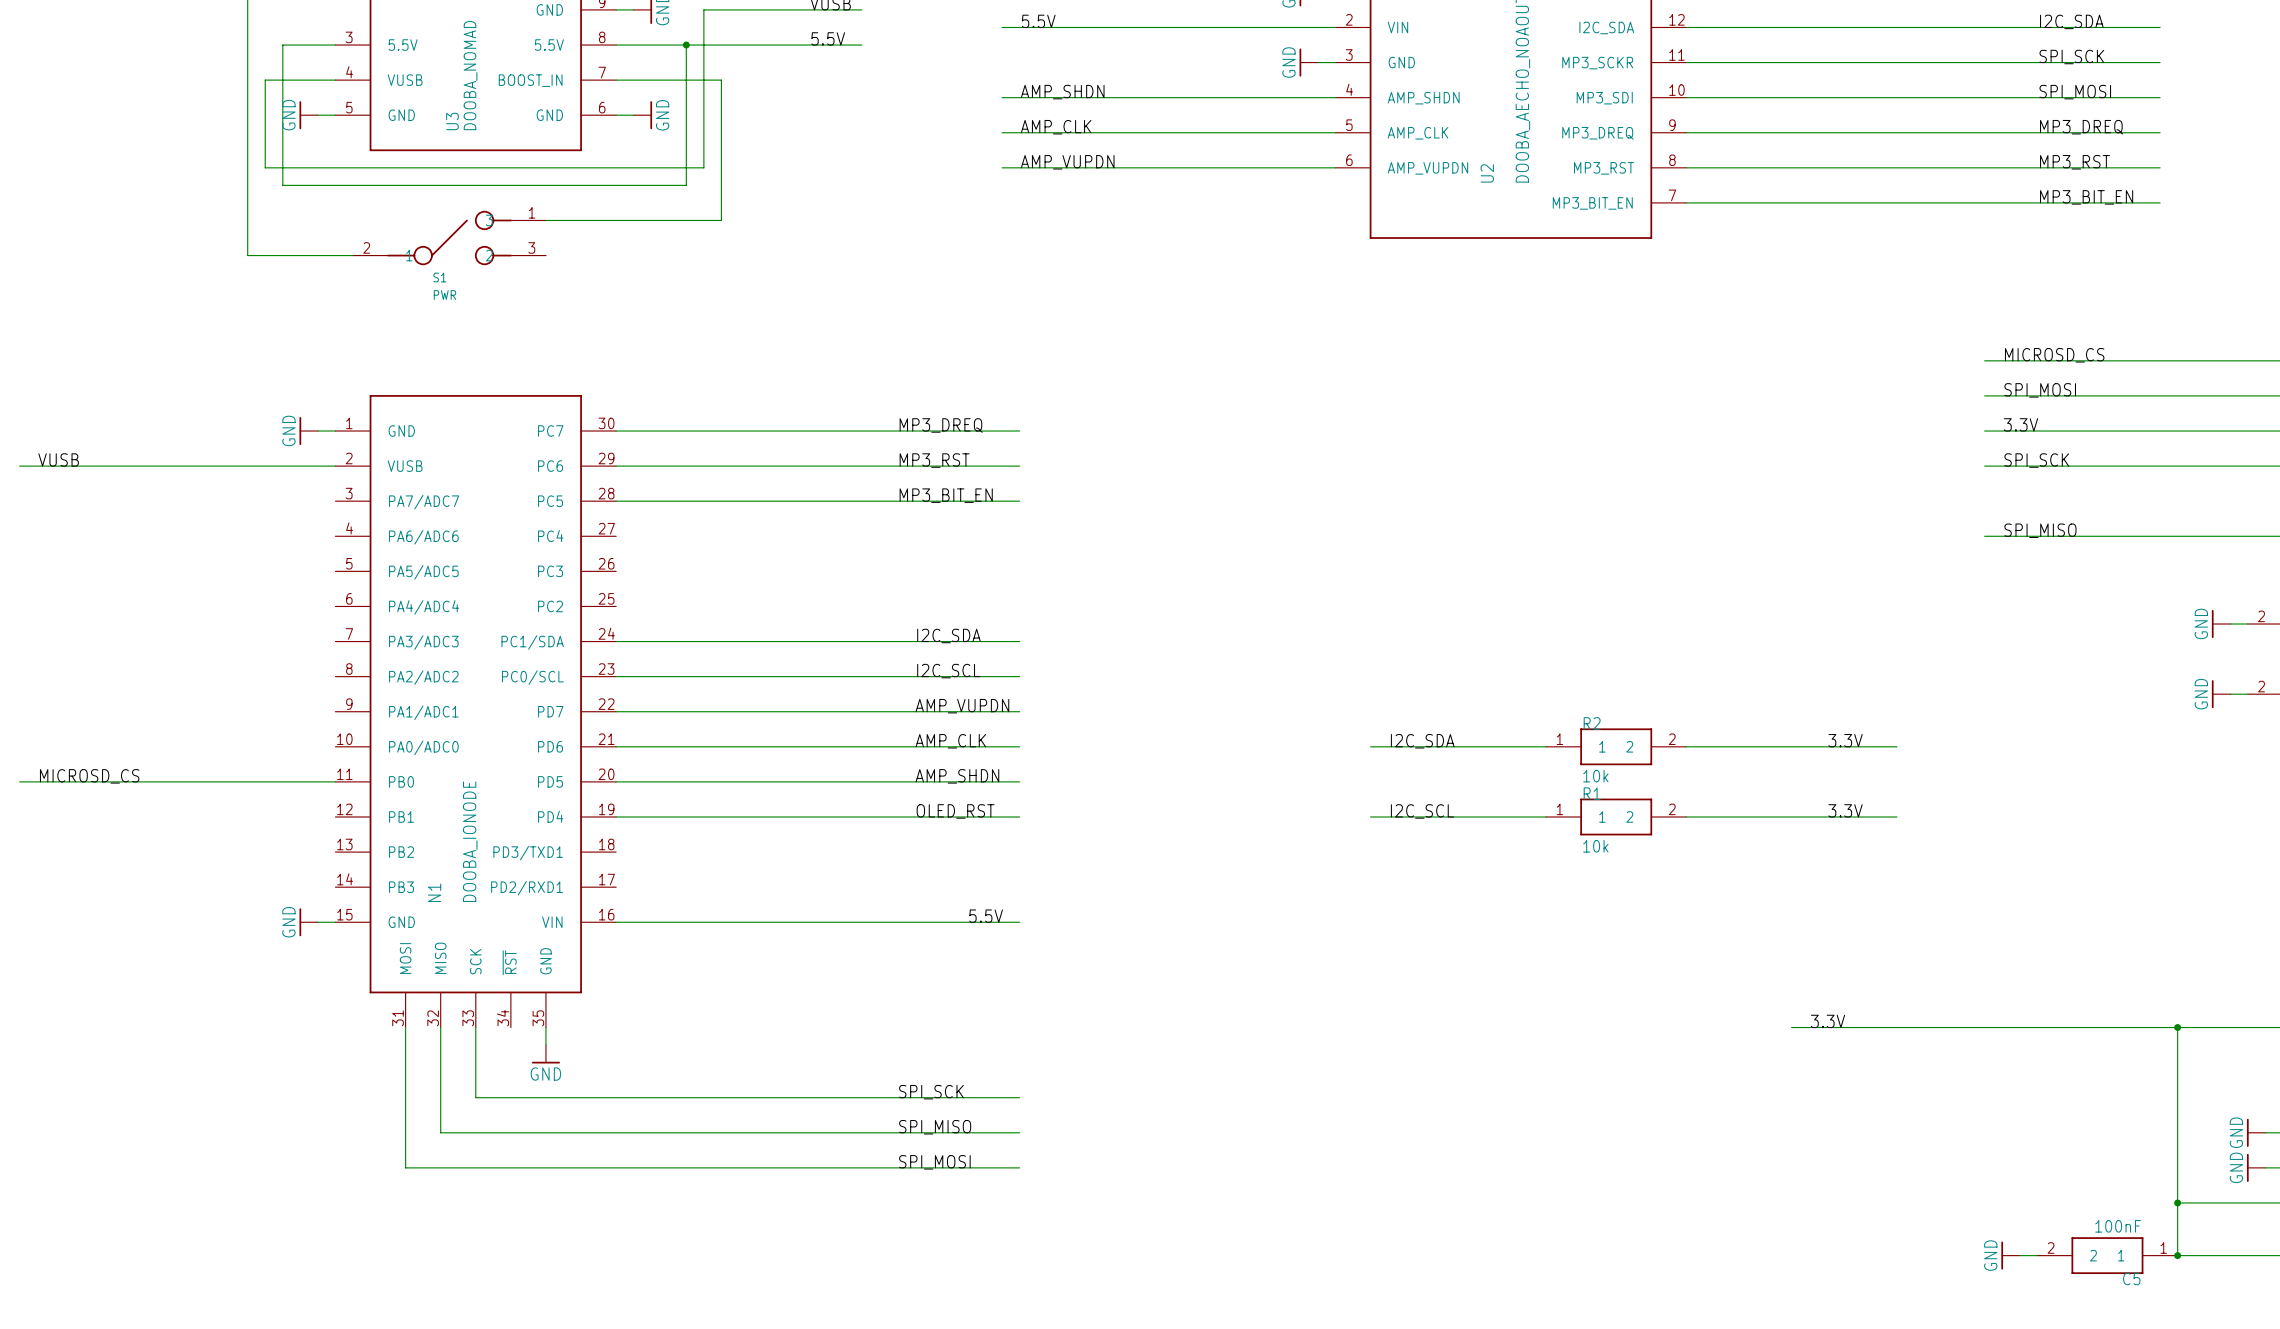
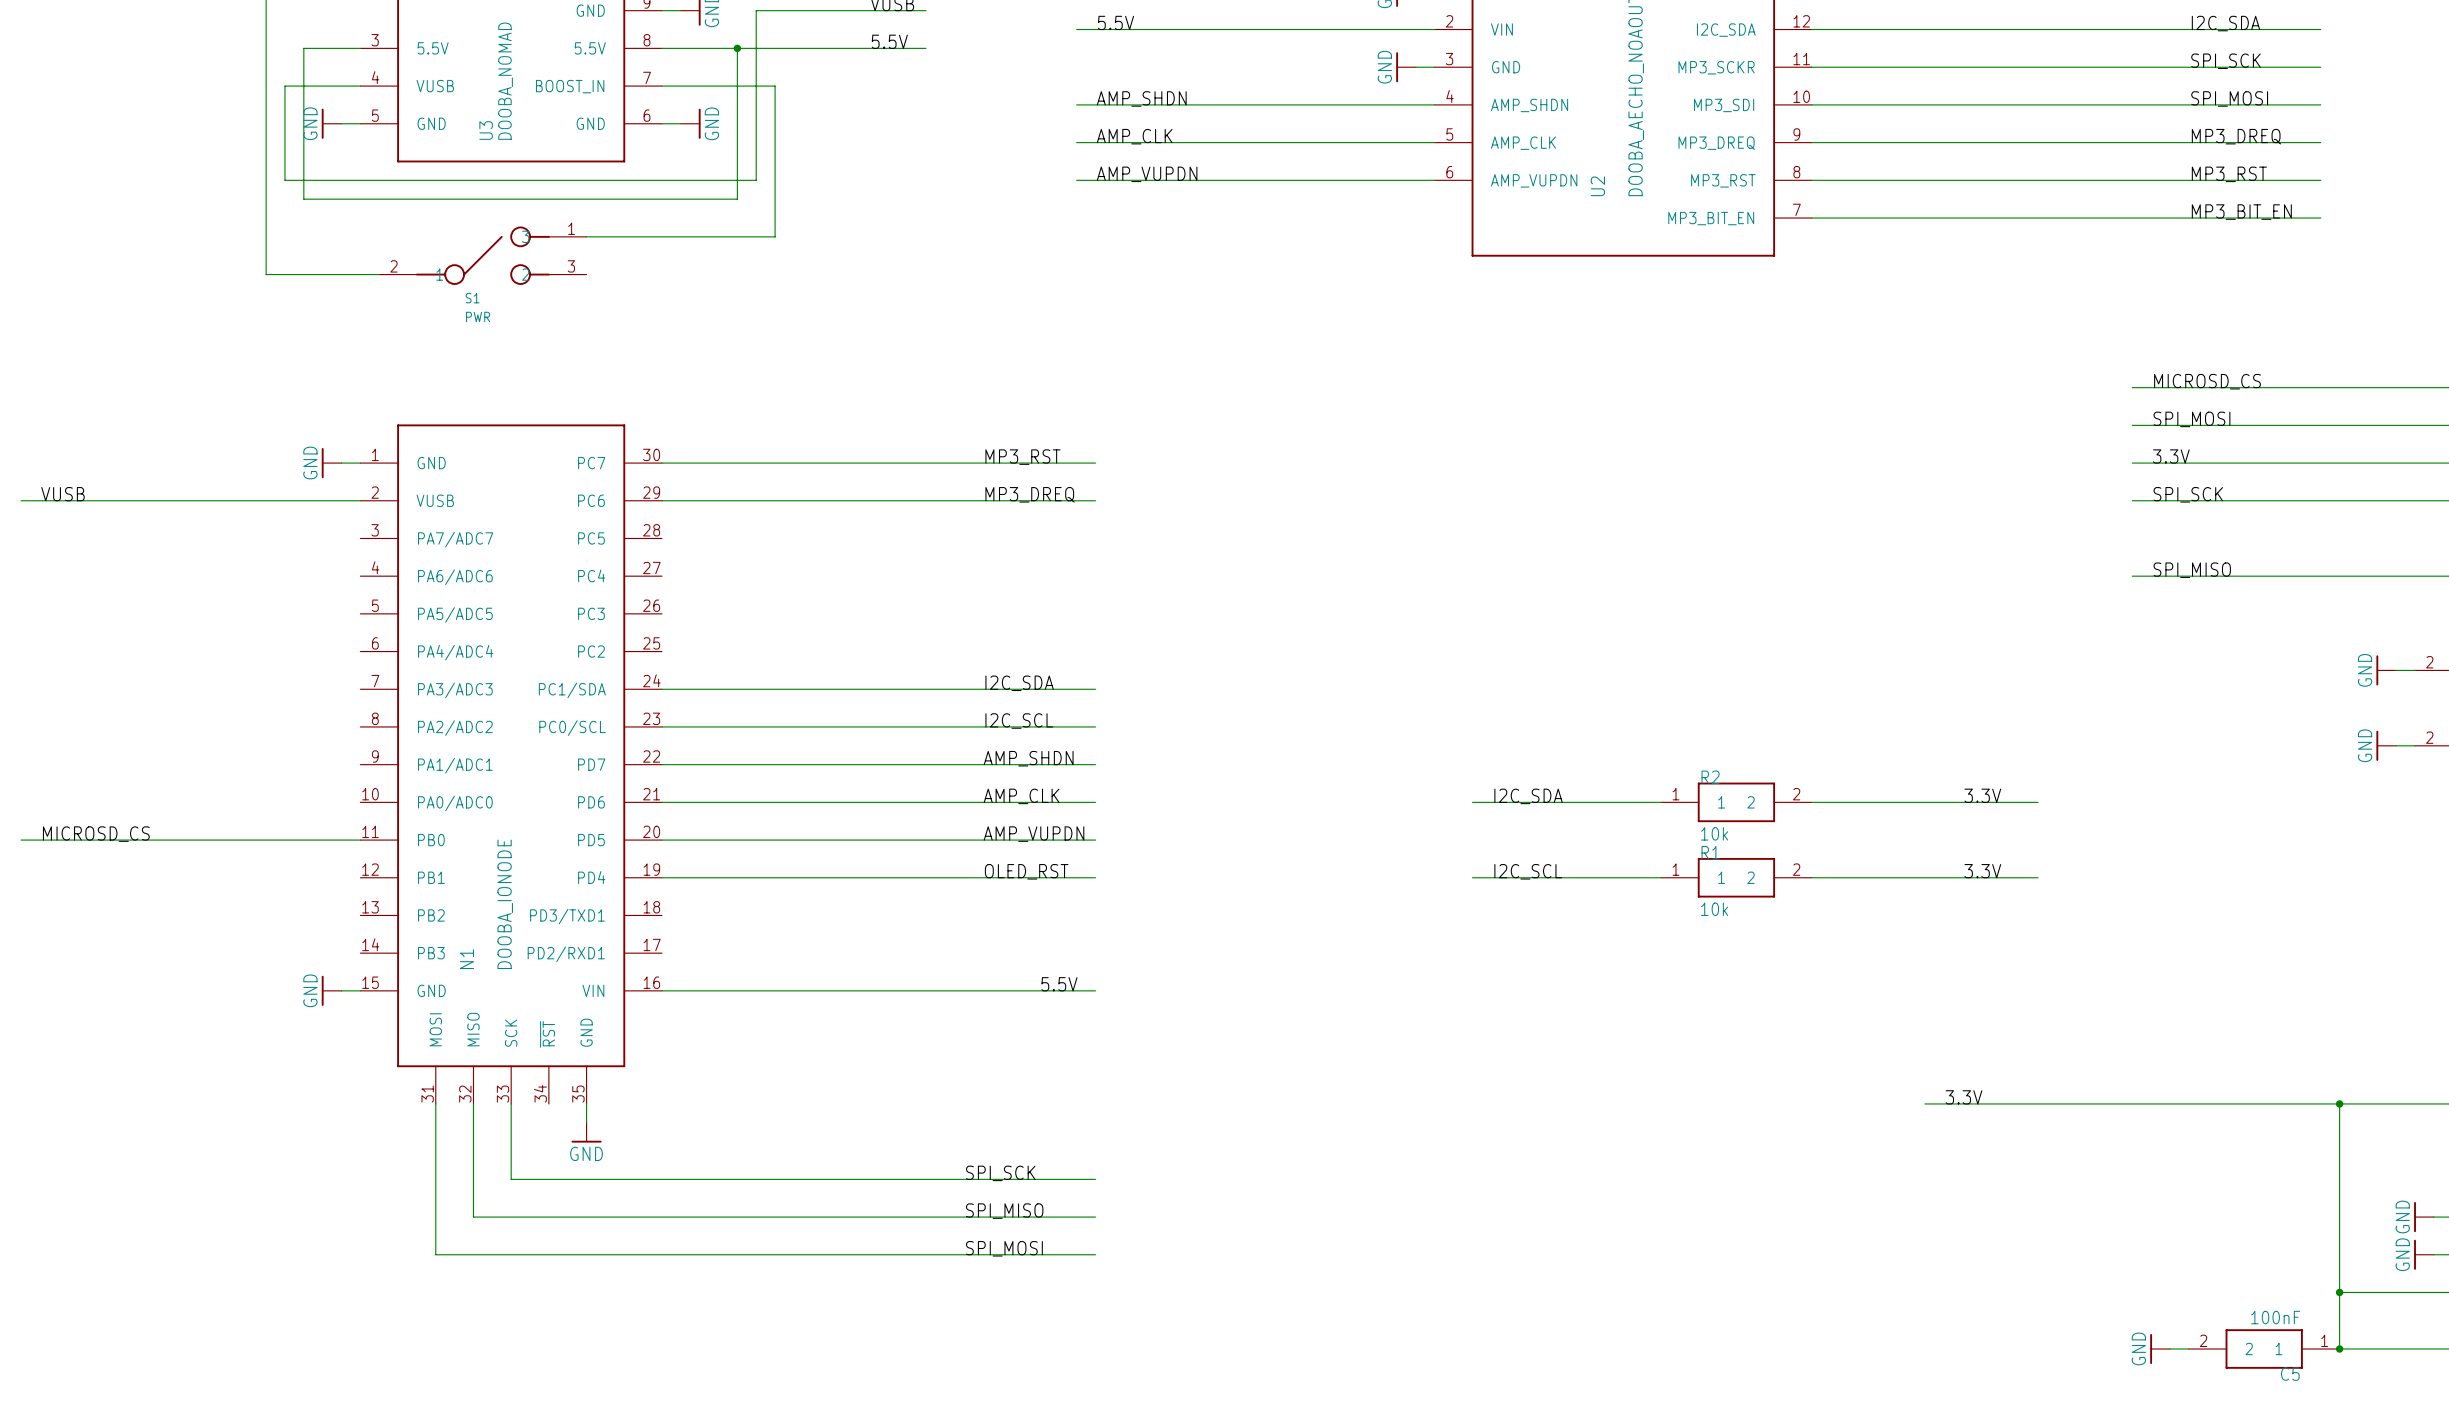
label position: MP3_DREQ (941, 425) -> MP3_DREQ (1030, 494)
label position: MP3_RST (934, 460) -> MP3_RST (1022, 457)
label: MP3_BIT_EN (946, 495) -> none
wire: (616, 501) (1019, 501) -> none
label: AMP_VUPDN (962, 706) -> AMP_SHDN (1028, 758)
label: AMP_SHDN (957, 776) -> AMP_VUPDN (1034, 834)

